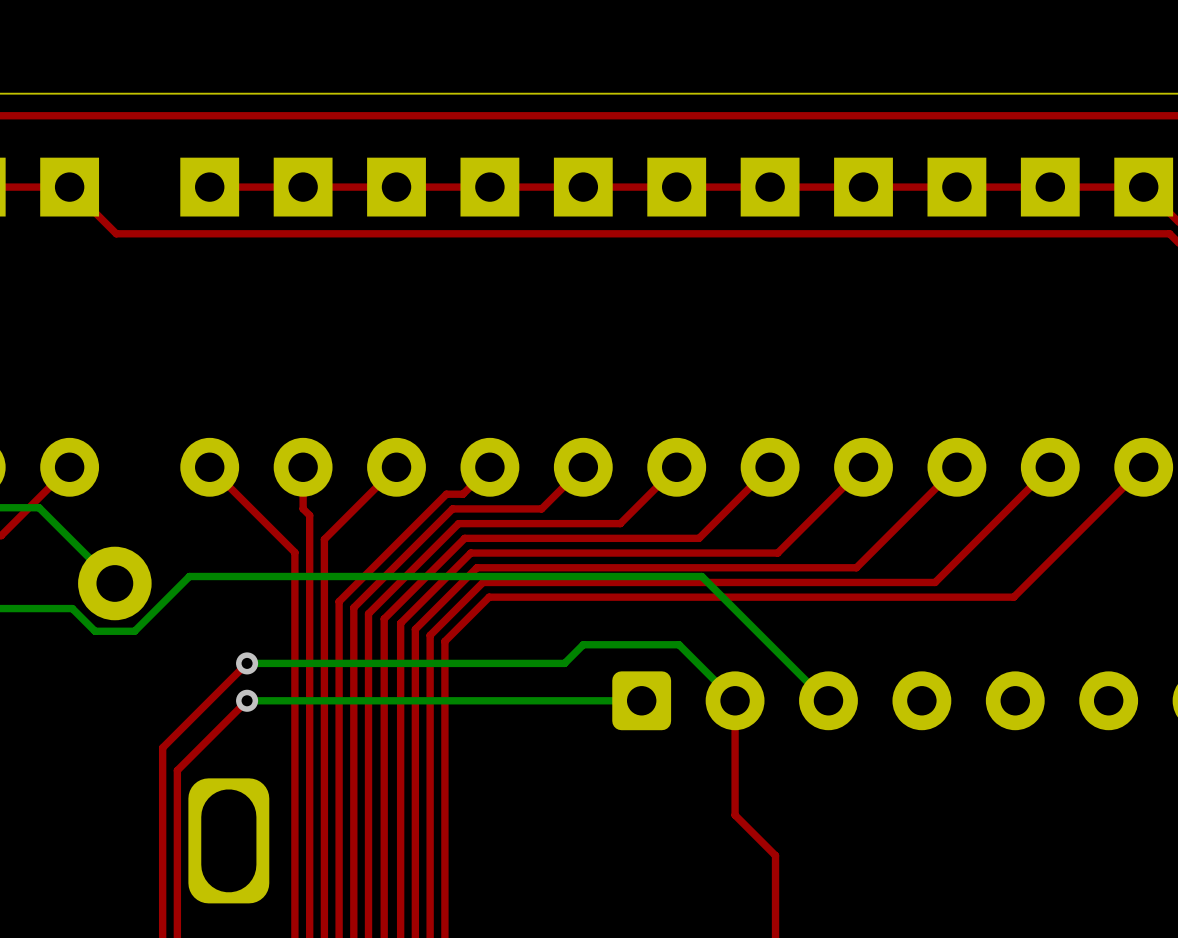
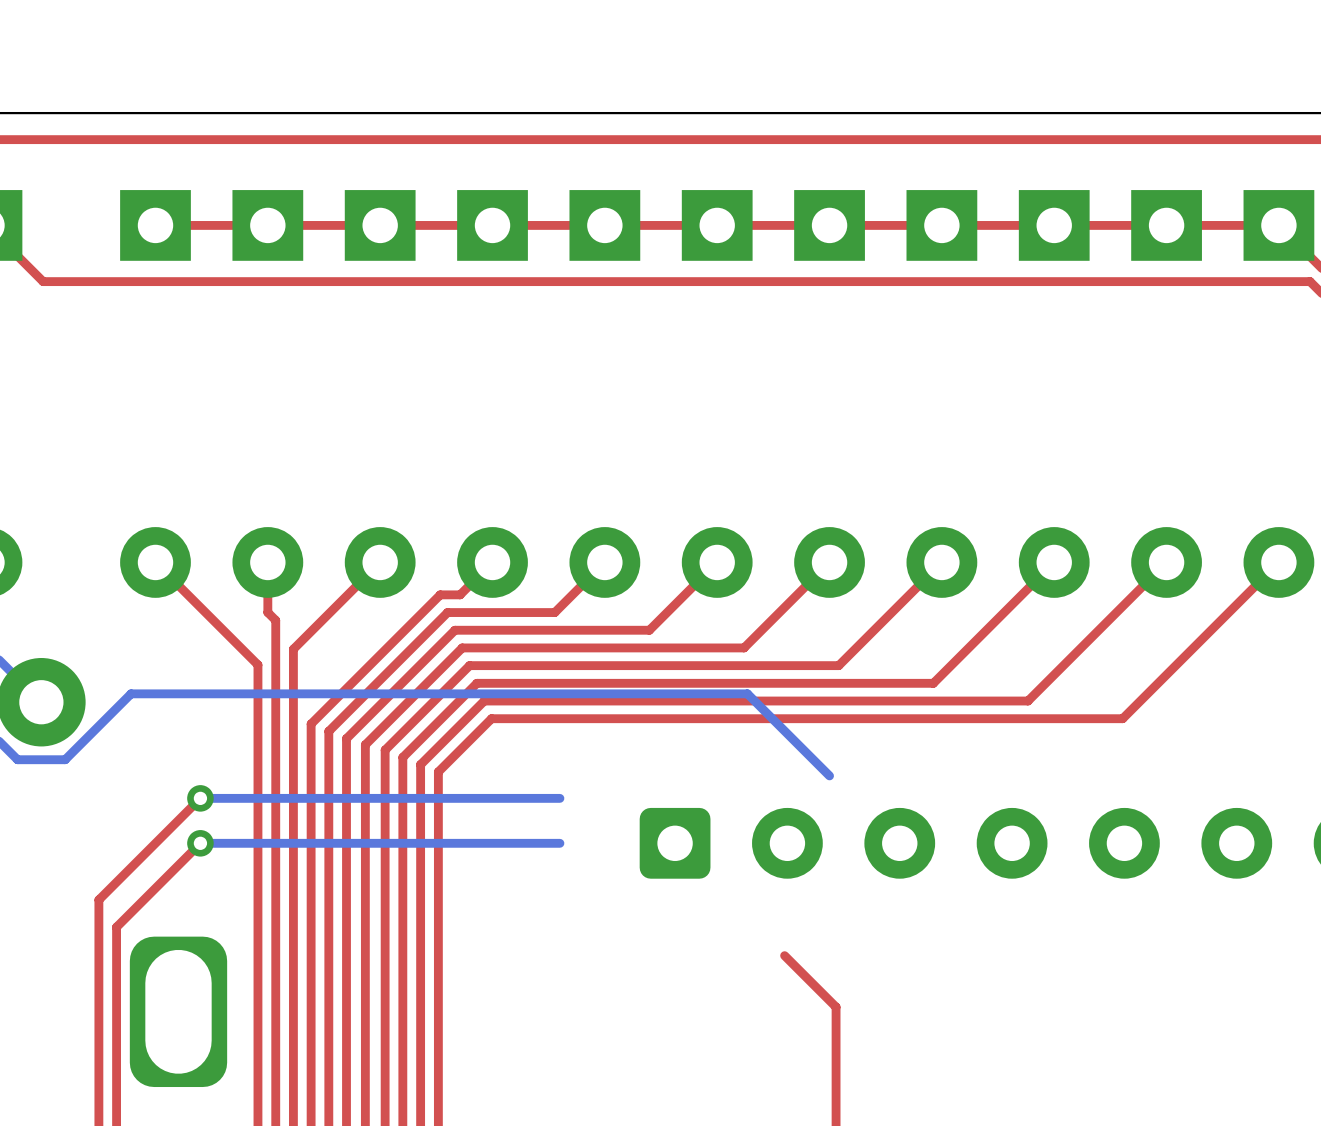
bottom track: (770, 644) (826, 700) (828, 700) -> none
bottom track: (545, 663) (564, 663) (583, 644) (679, 644) (735, 700) -> none
bottom track: (641, 700) (545, 700) -> none
top track: (735, 700) (735, 815) (775, 855) -> (784, 955) (836, 1007) (836, 1029)

